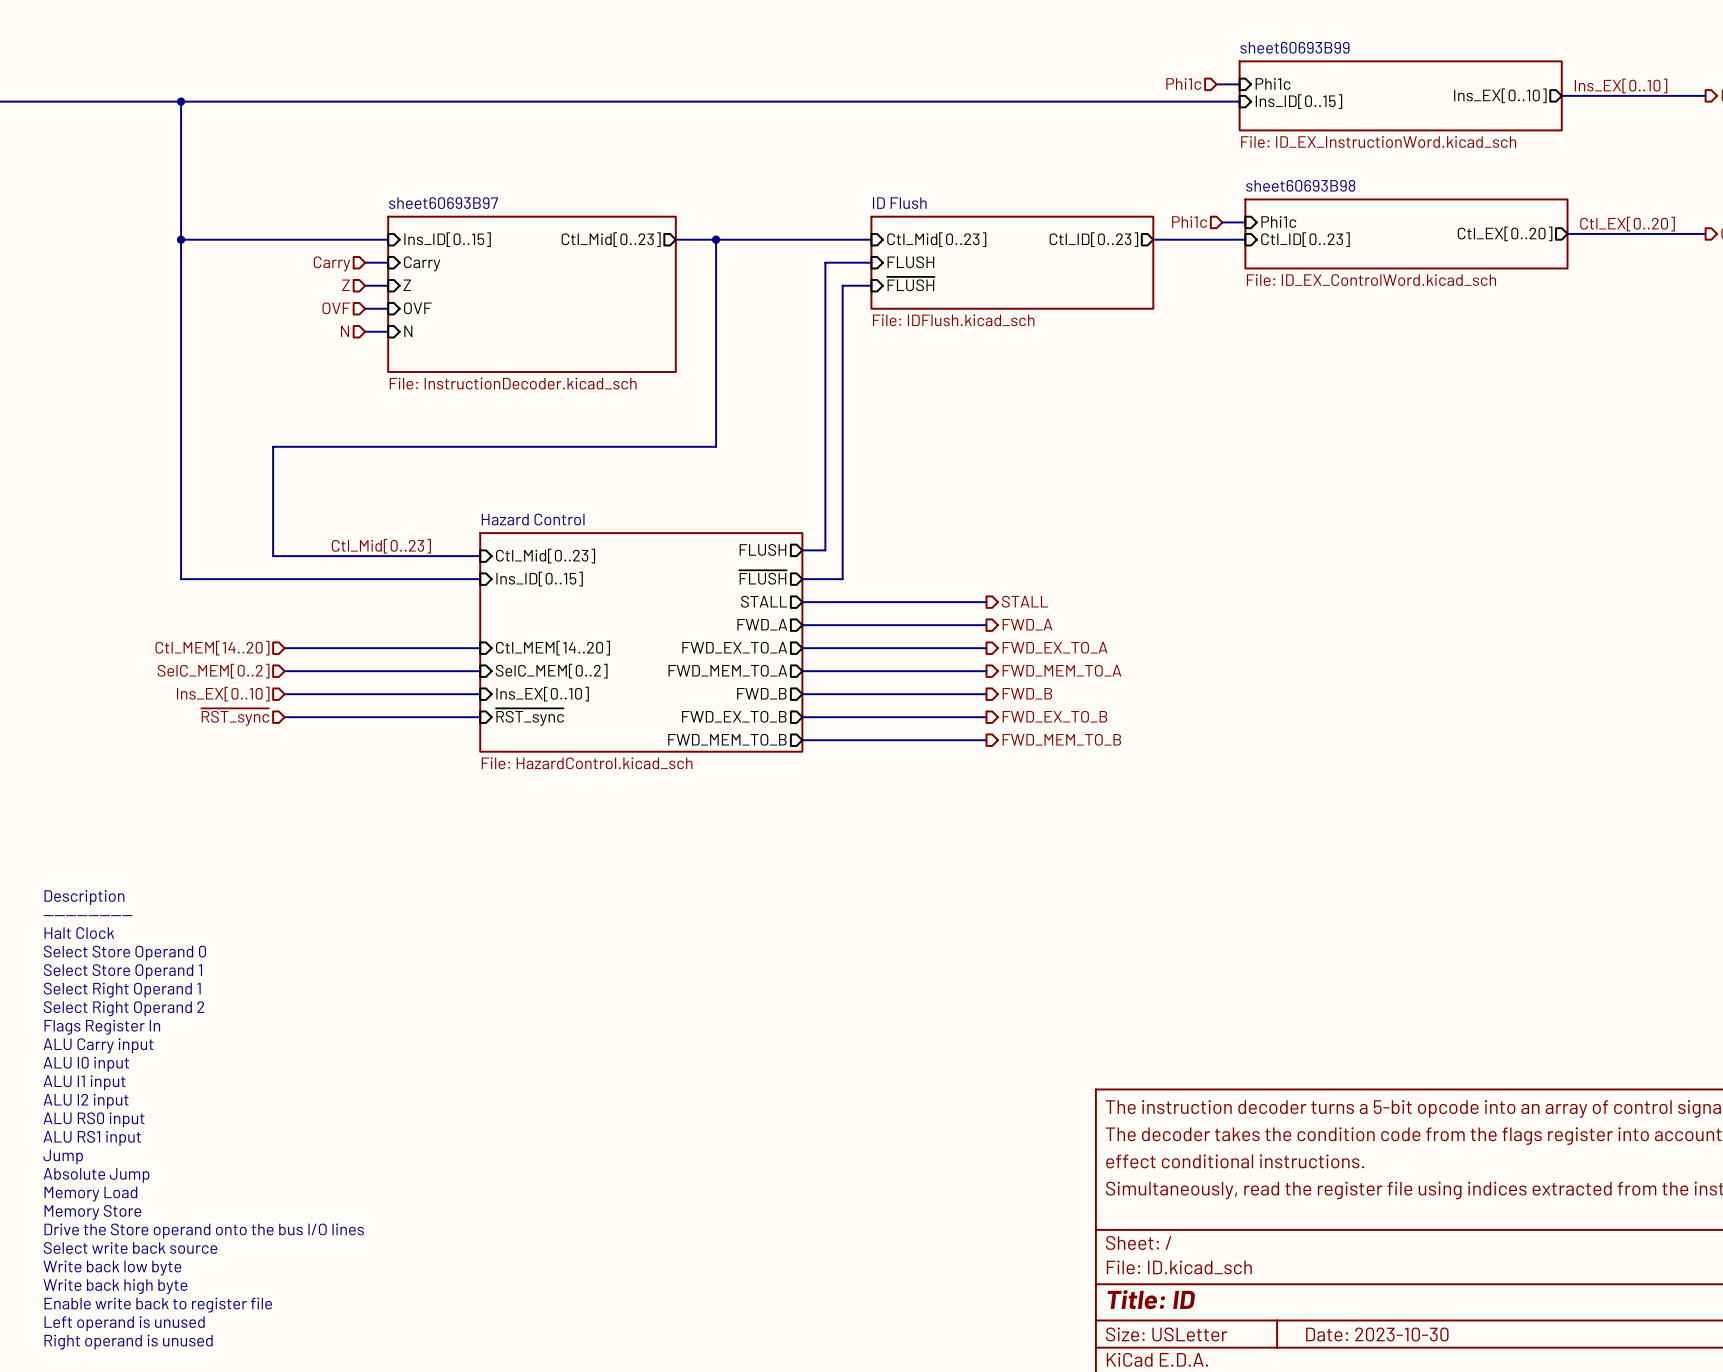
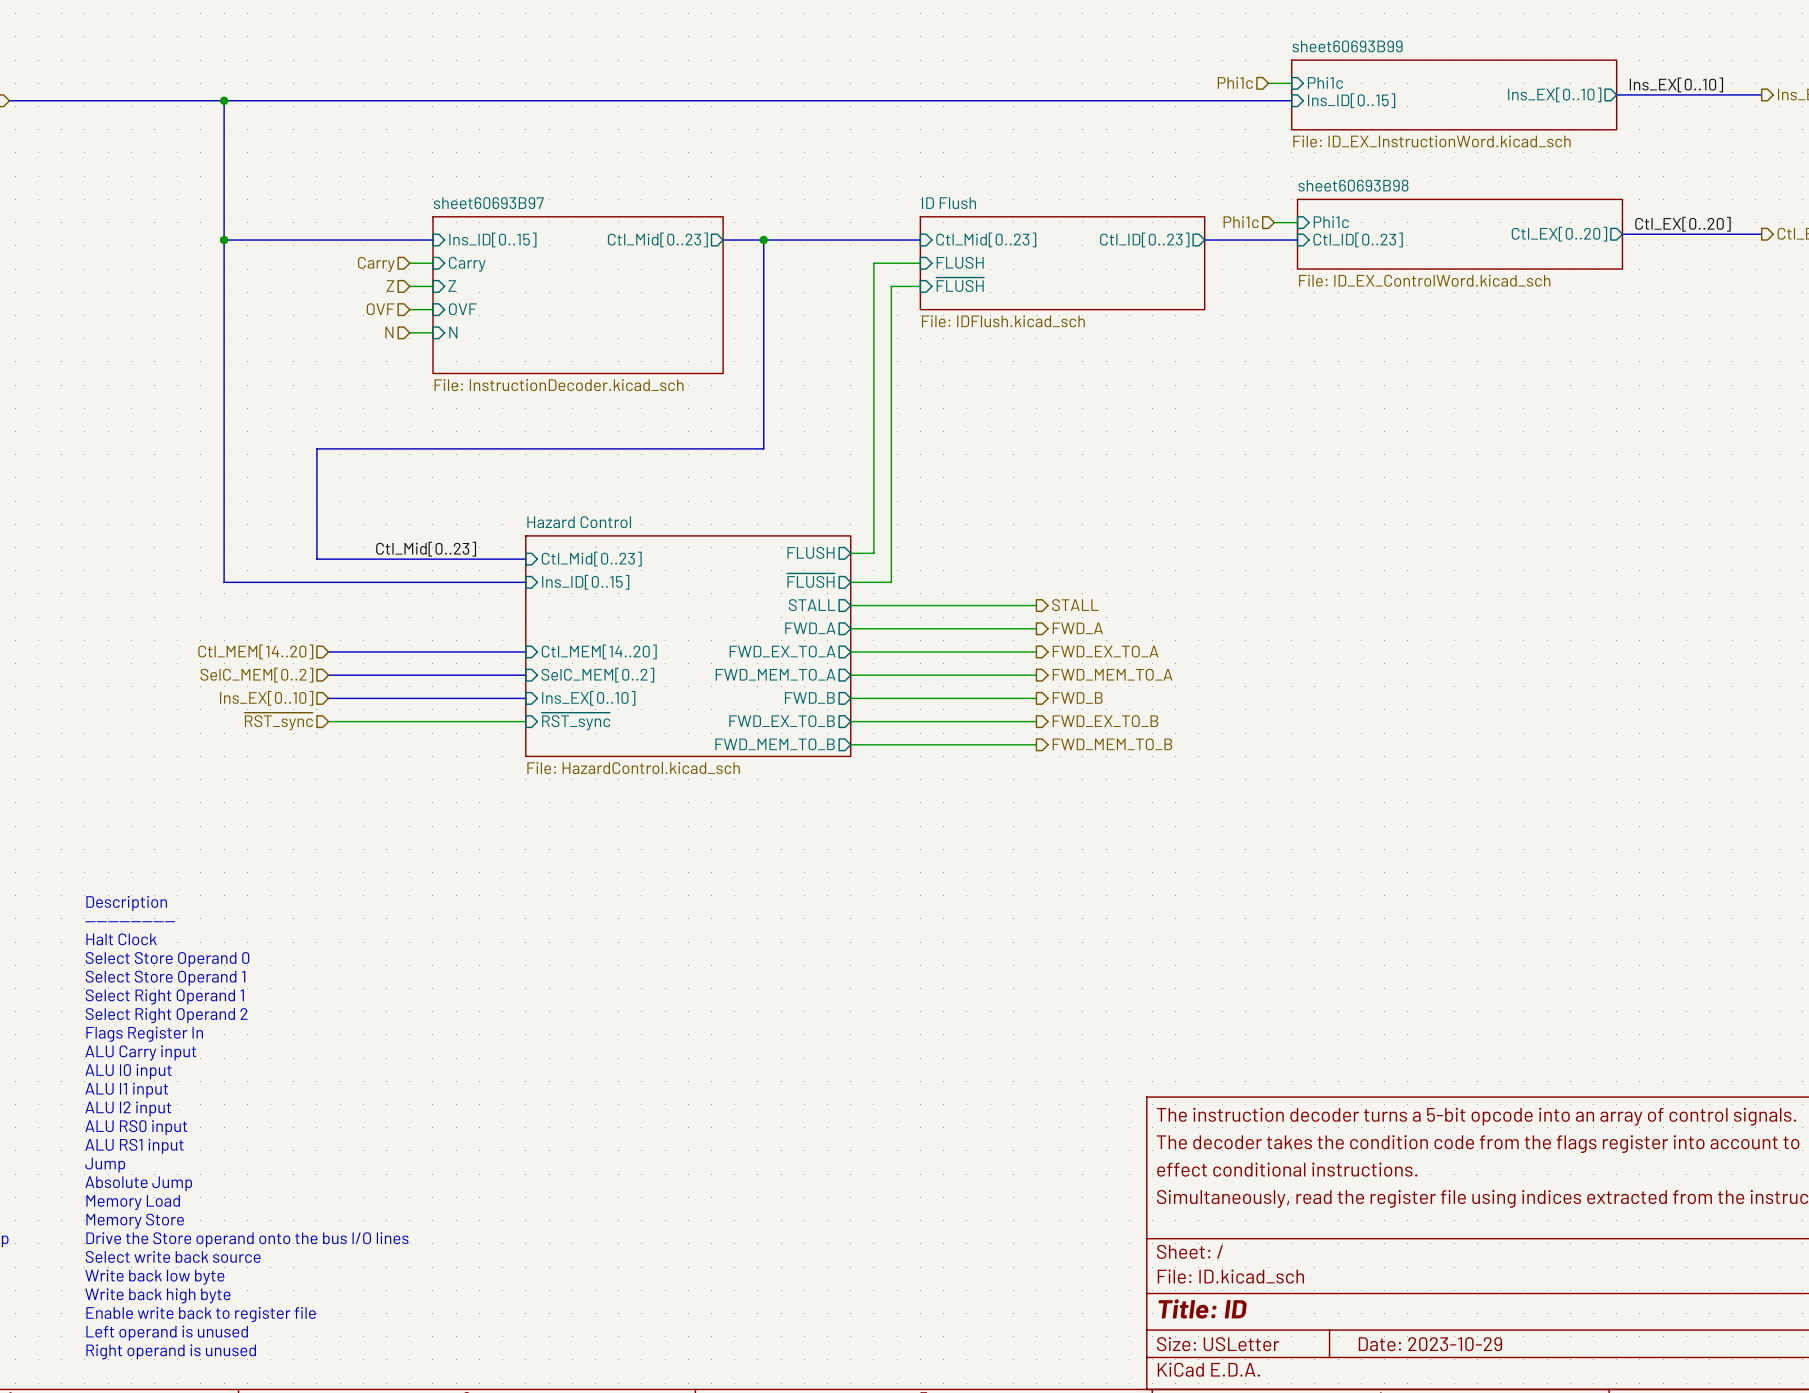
title block: Date: 2023-10-30 (1377, 1334) -> Date: 2023-10-29 (1430, 1344)

